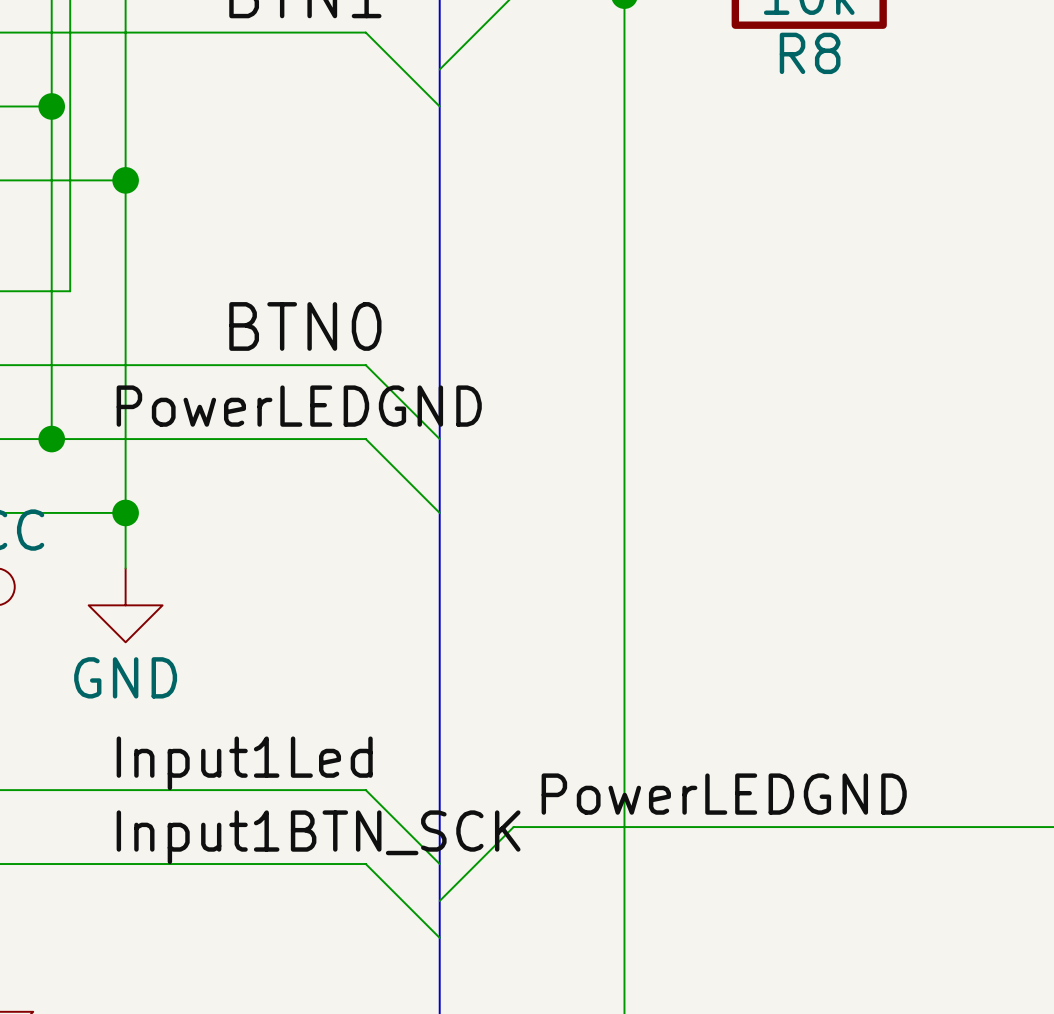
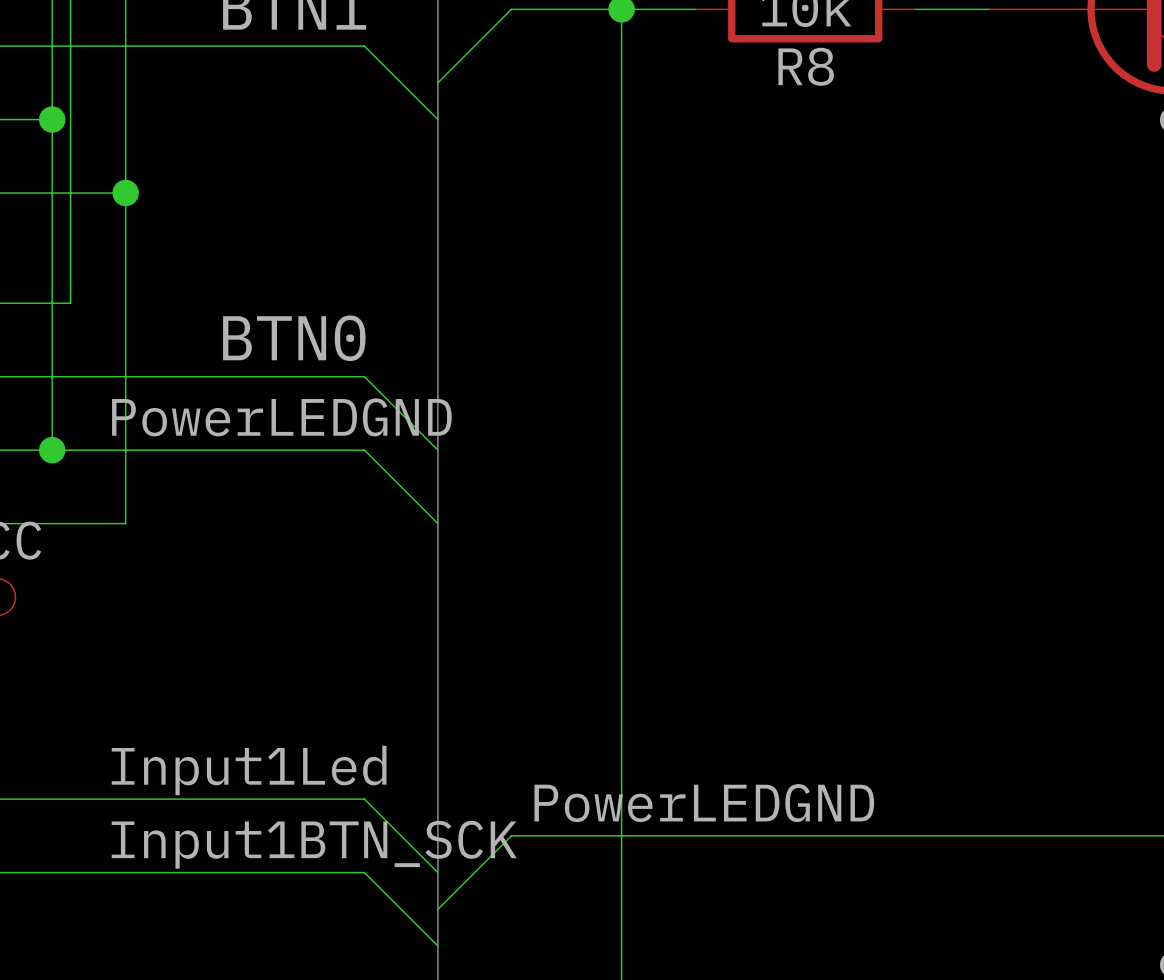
wire: (125, 512) (125, 568) -> none
junction: (125, 512) -> none
power symbol: GND (125, 605) -> none

